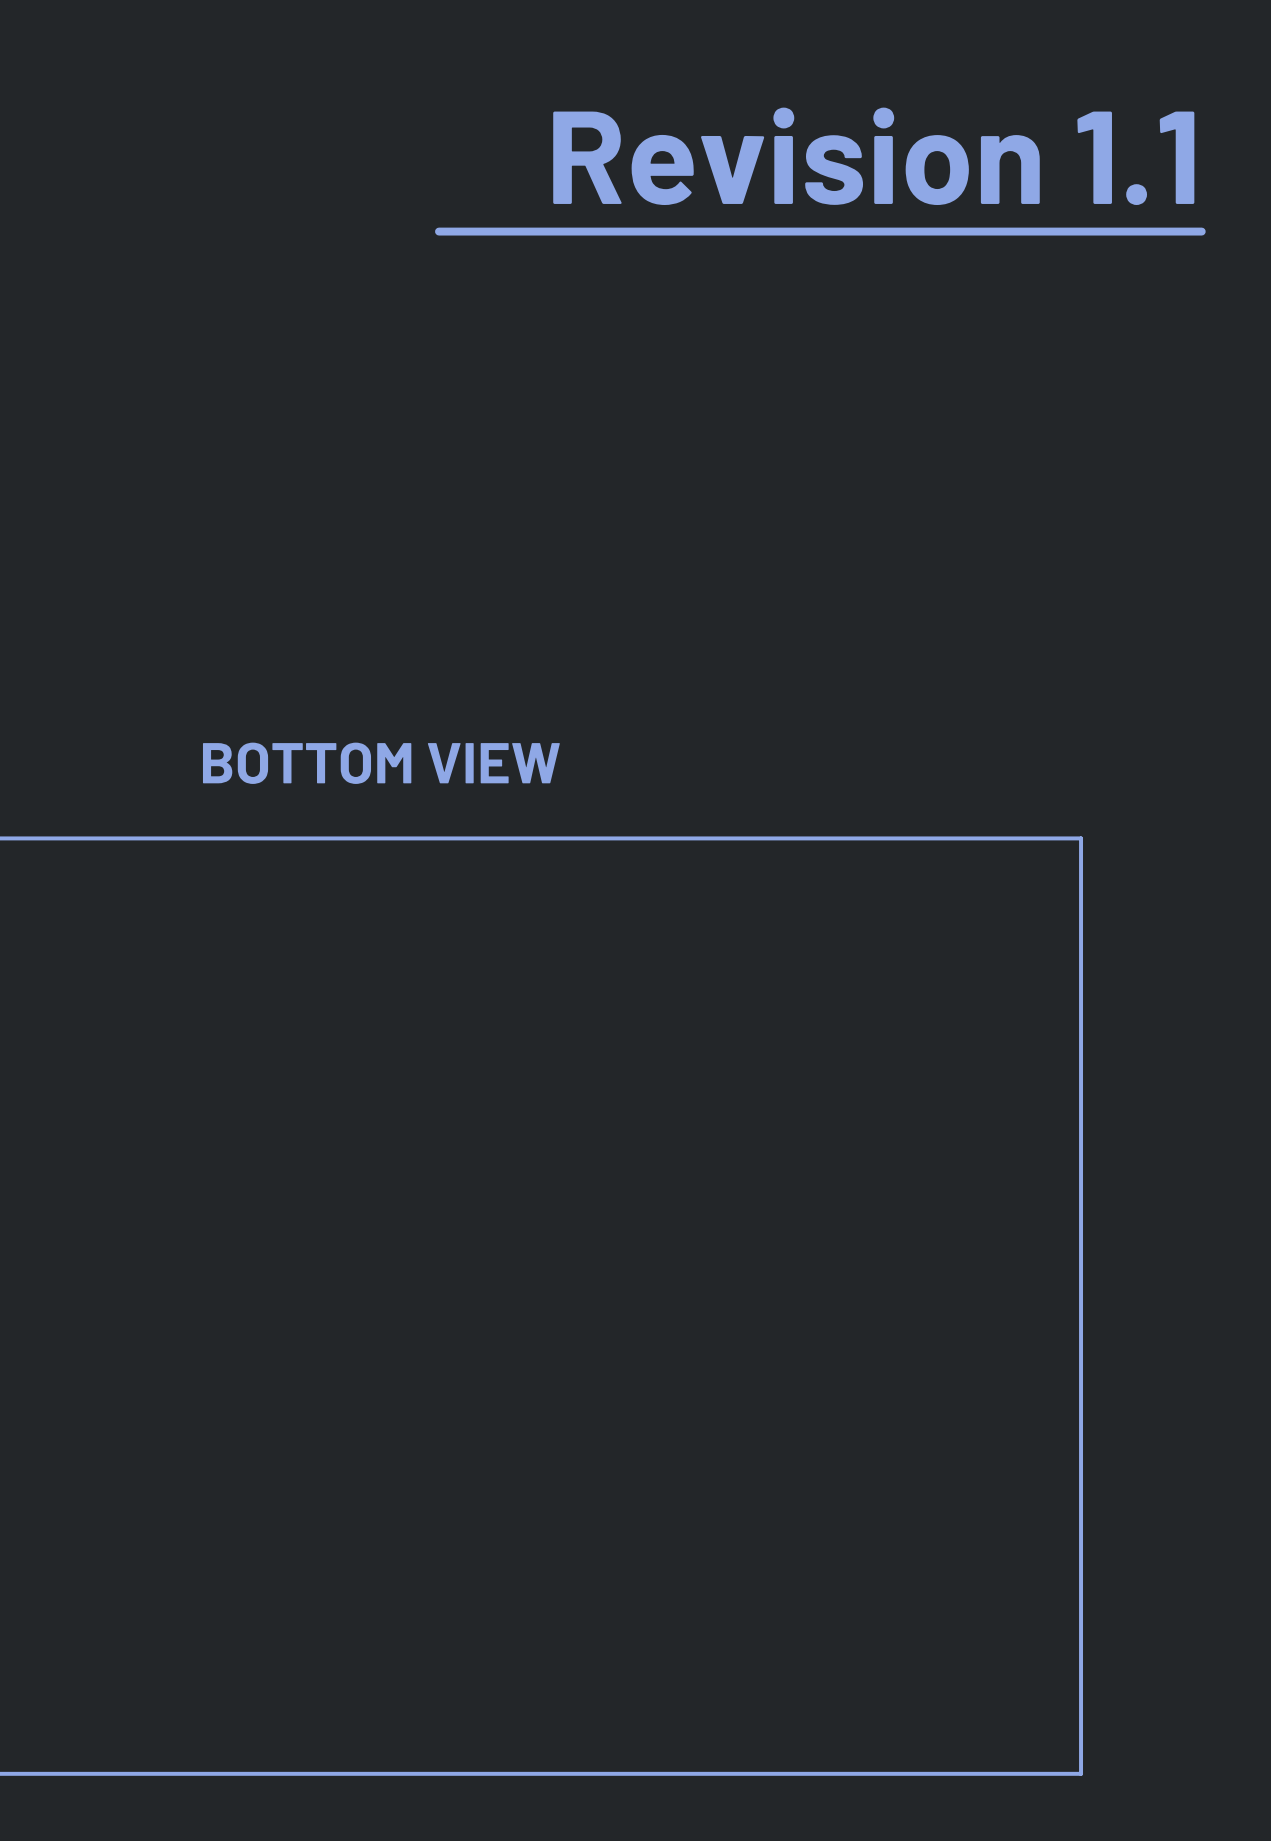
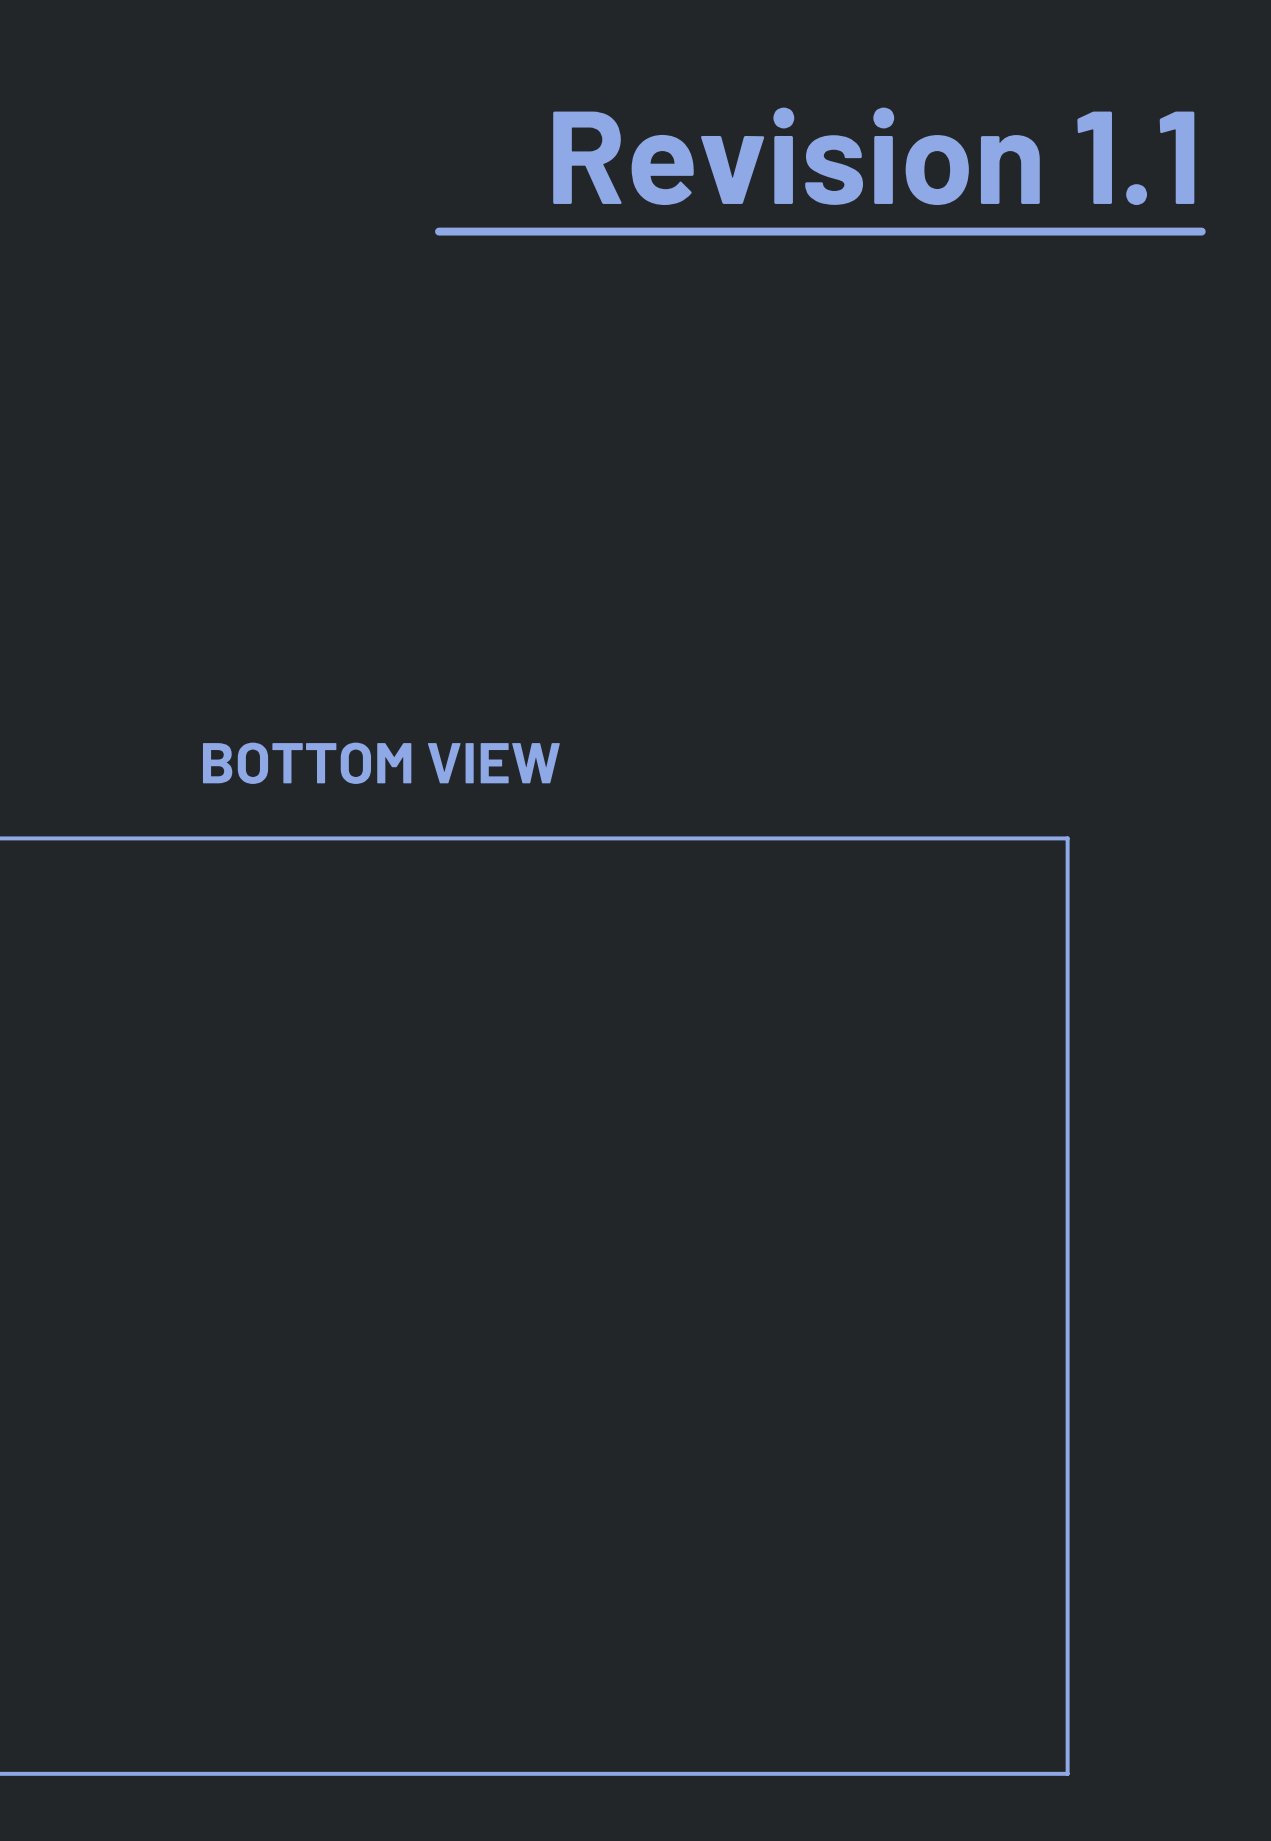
line: (1067, 838) (1081, 838) (1081, 1773) (1067, 1773) -> (1067, 838) (1067, 1773)

